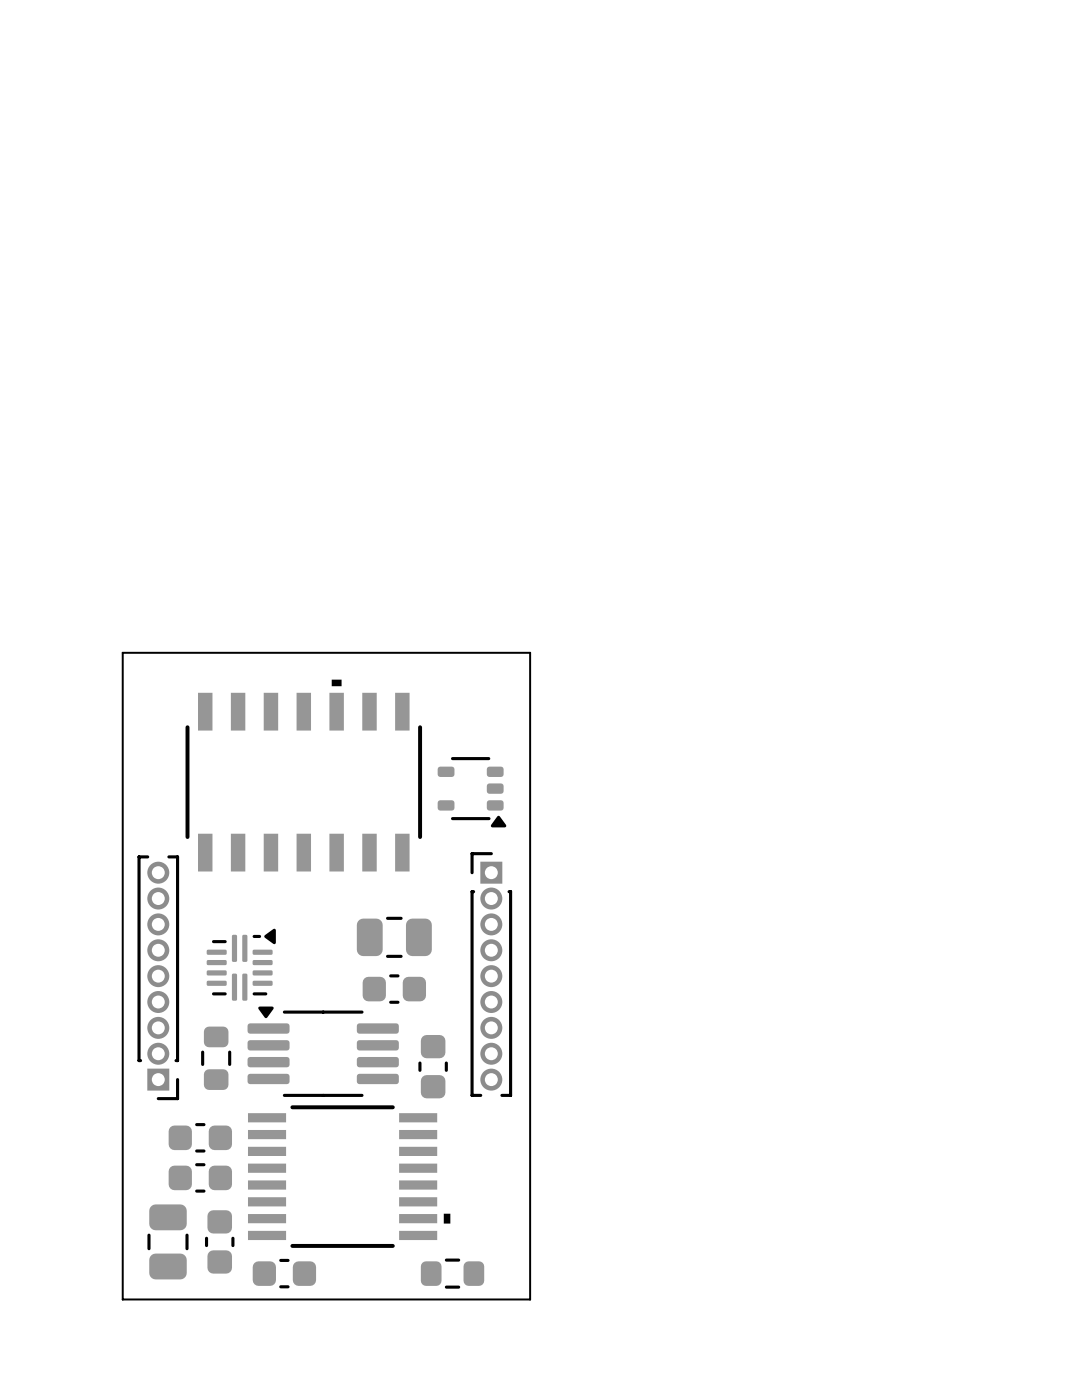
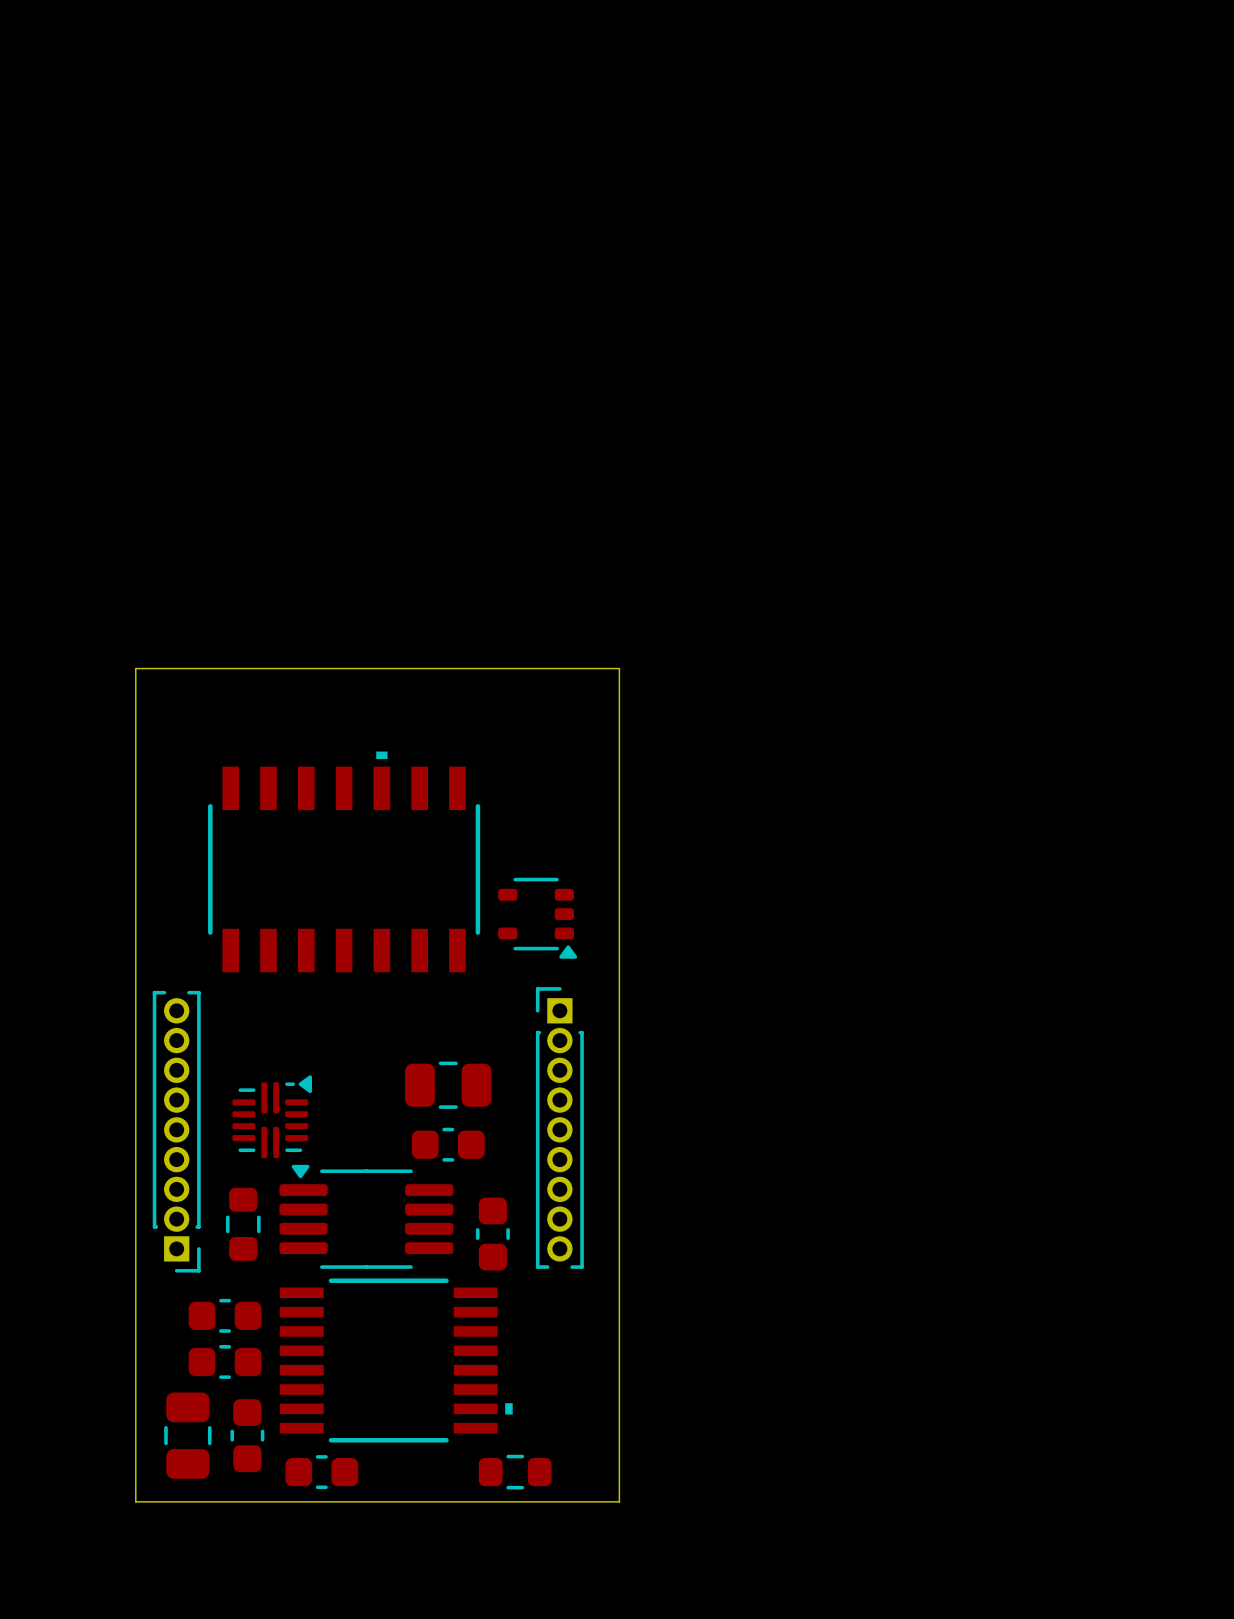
board edge: (122, 652) (530, 652) (530, 1299) -> (135, 757) (135, 668) (619, 668) (619, 1501) (604, 1501)
part position: (303, 775) -> (344, 861)

